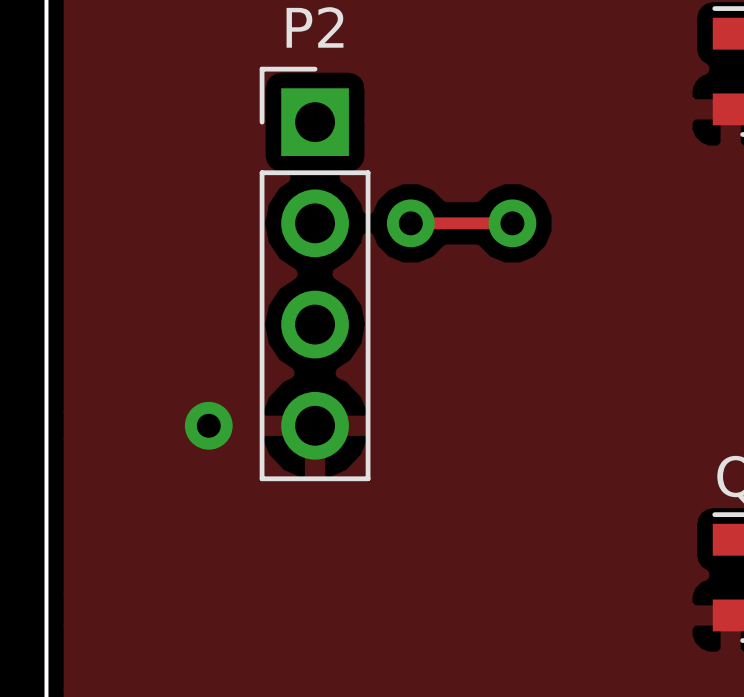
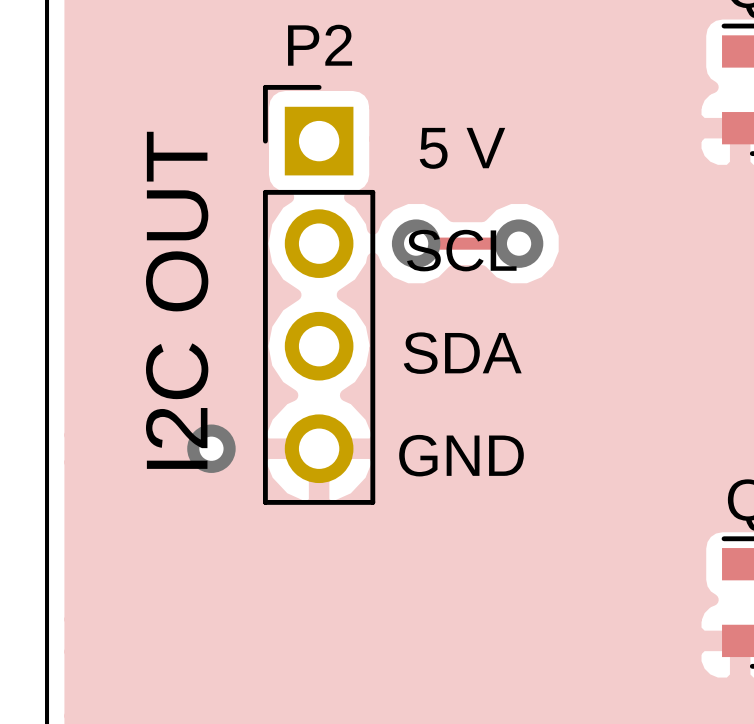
text: none -> 5 V (462, 148)
text: none -> SCL (461, 250)
text: none -> I2C OUT (177, 300)
text: none -> SDA (462, 353)
text: none -> GND (461, 455)

